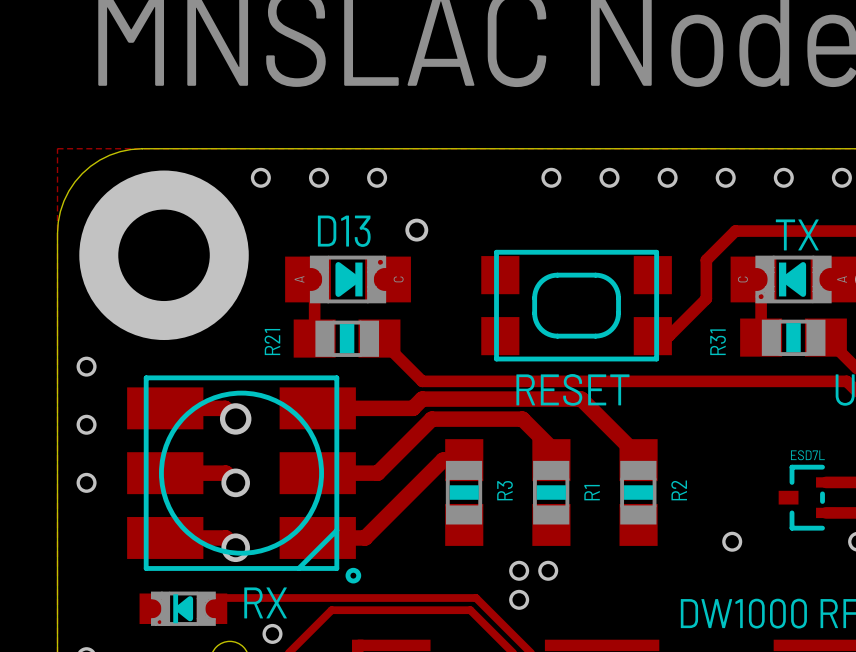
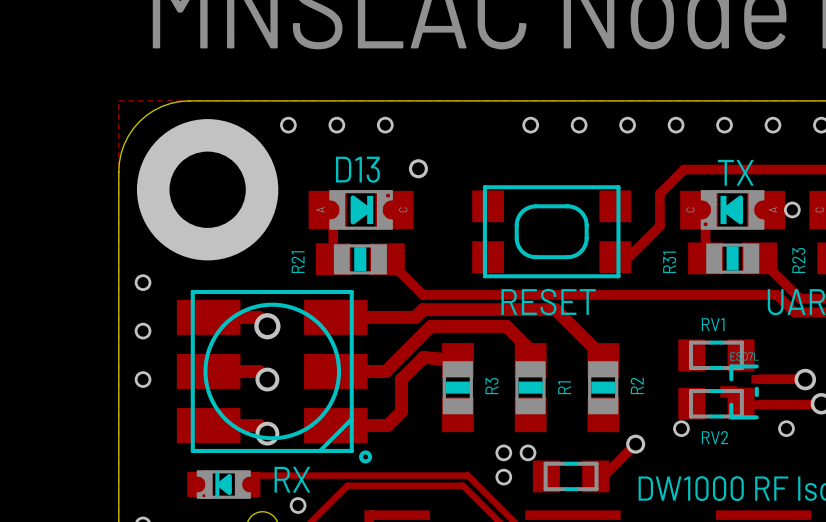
text: none -> RV1 (713, 324)
part: none -> (716, 355)
track: (464, 460) (443, 460) (365, 537) -> (458, 360) (423, 357) (401, 379) (401, 411) (387, 425) (375, 425)
part: none -> (716, 403)
text: none -> RV2 (715, 437)
track: none -> (635, 444) (603, 476) (595, 476)
via: none -> (635, 444)
part: none -> (571, 476)

